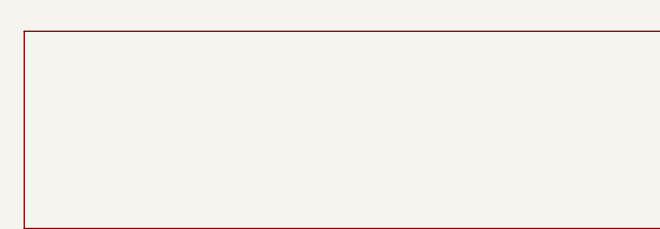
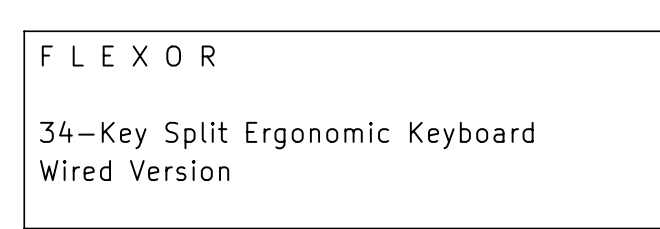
title block: none -> F L E X O R (128, 56)
title block: none -> 34-Key Split Ergonomic Keyboard (286, 135)
title block: none -> Wired Version (134, 170)

